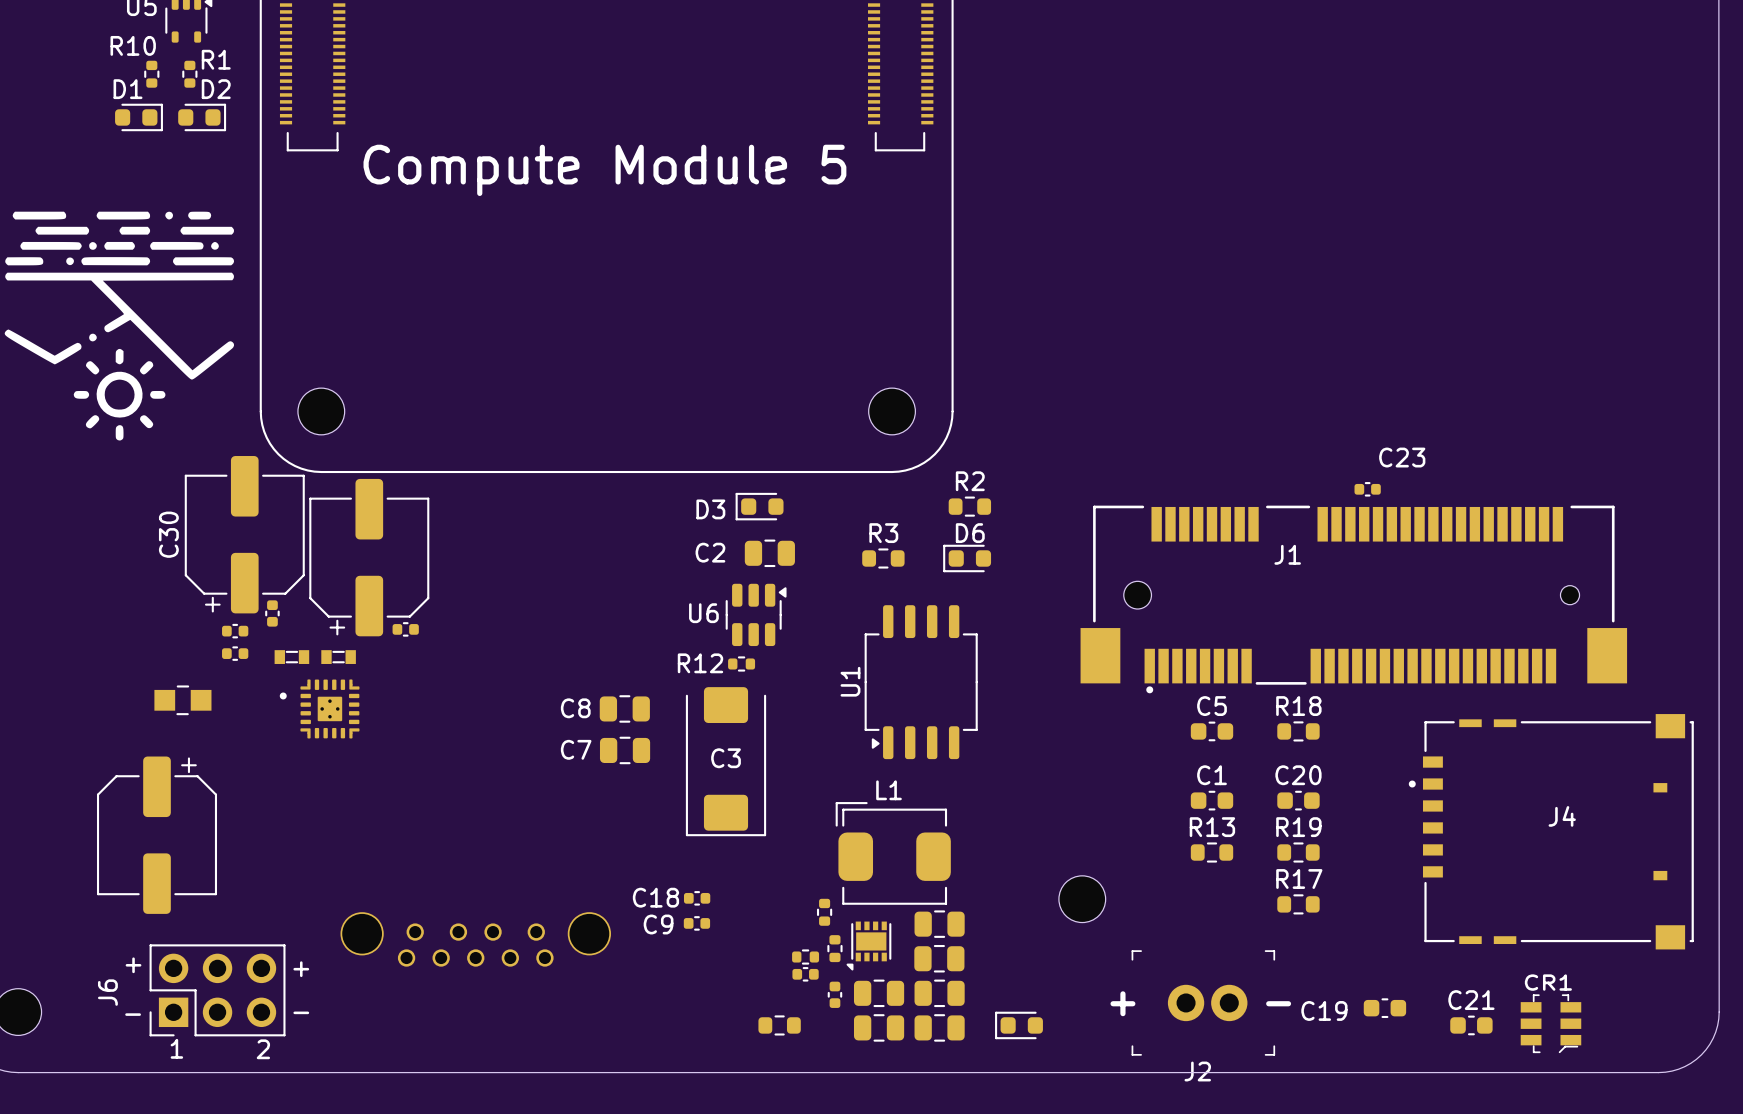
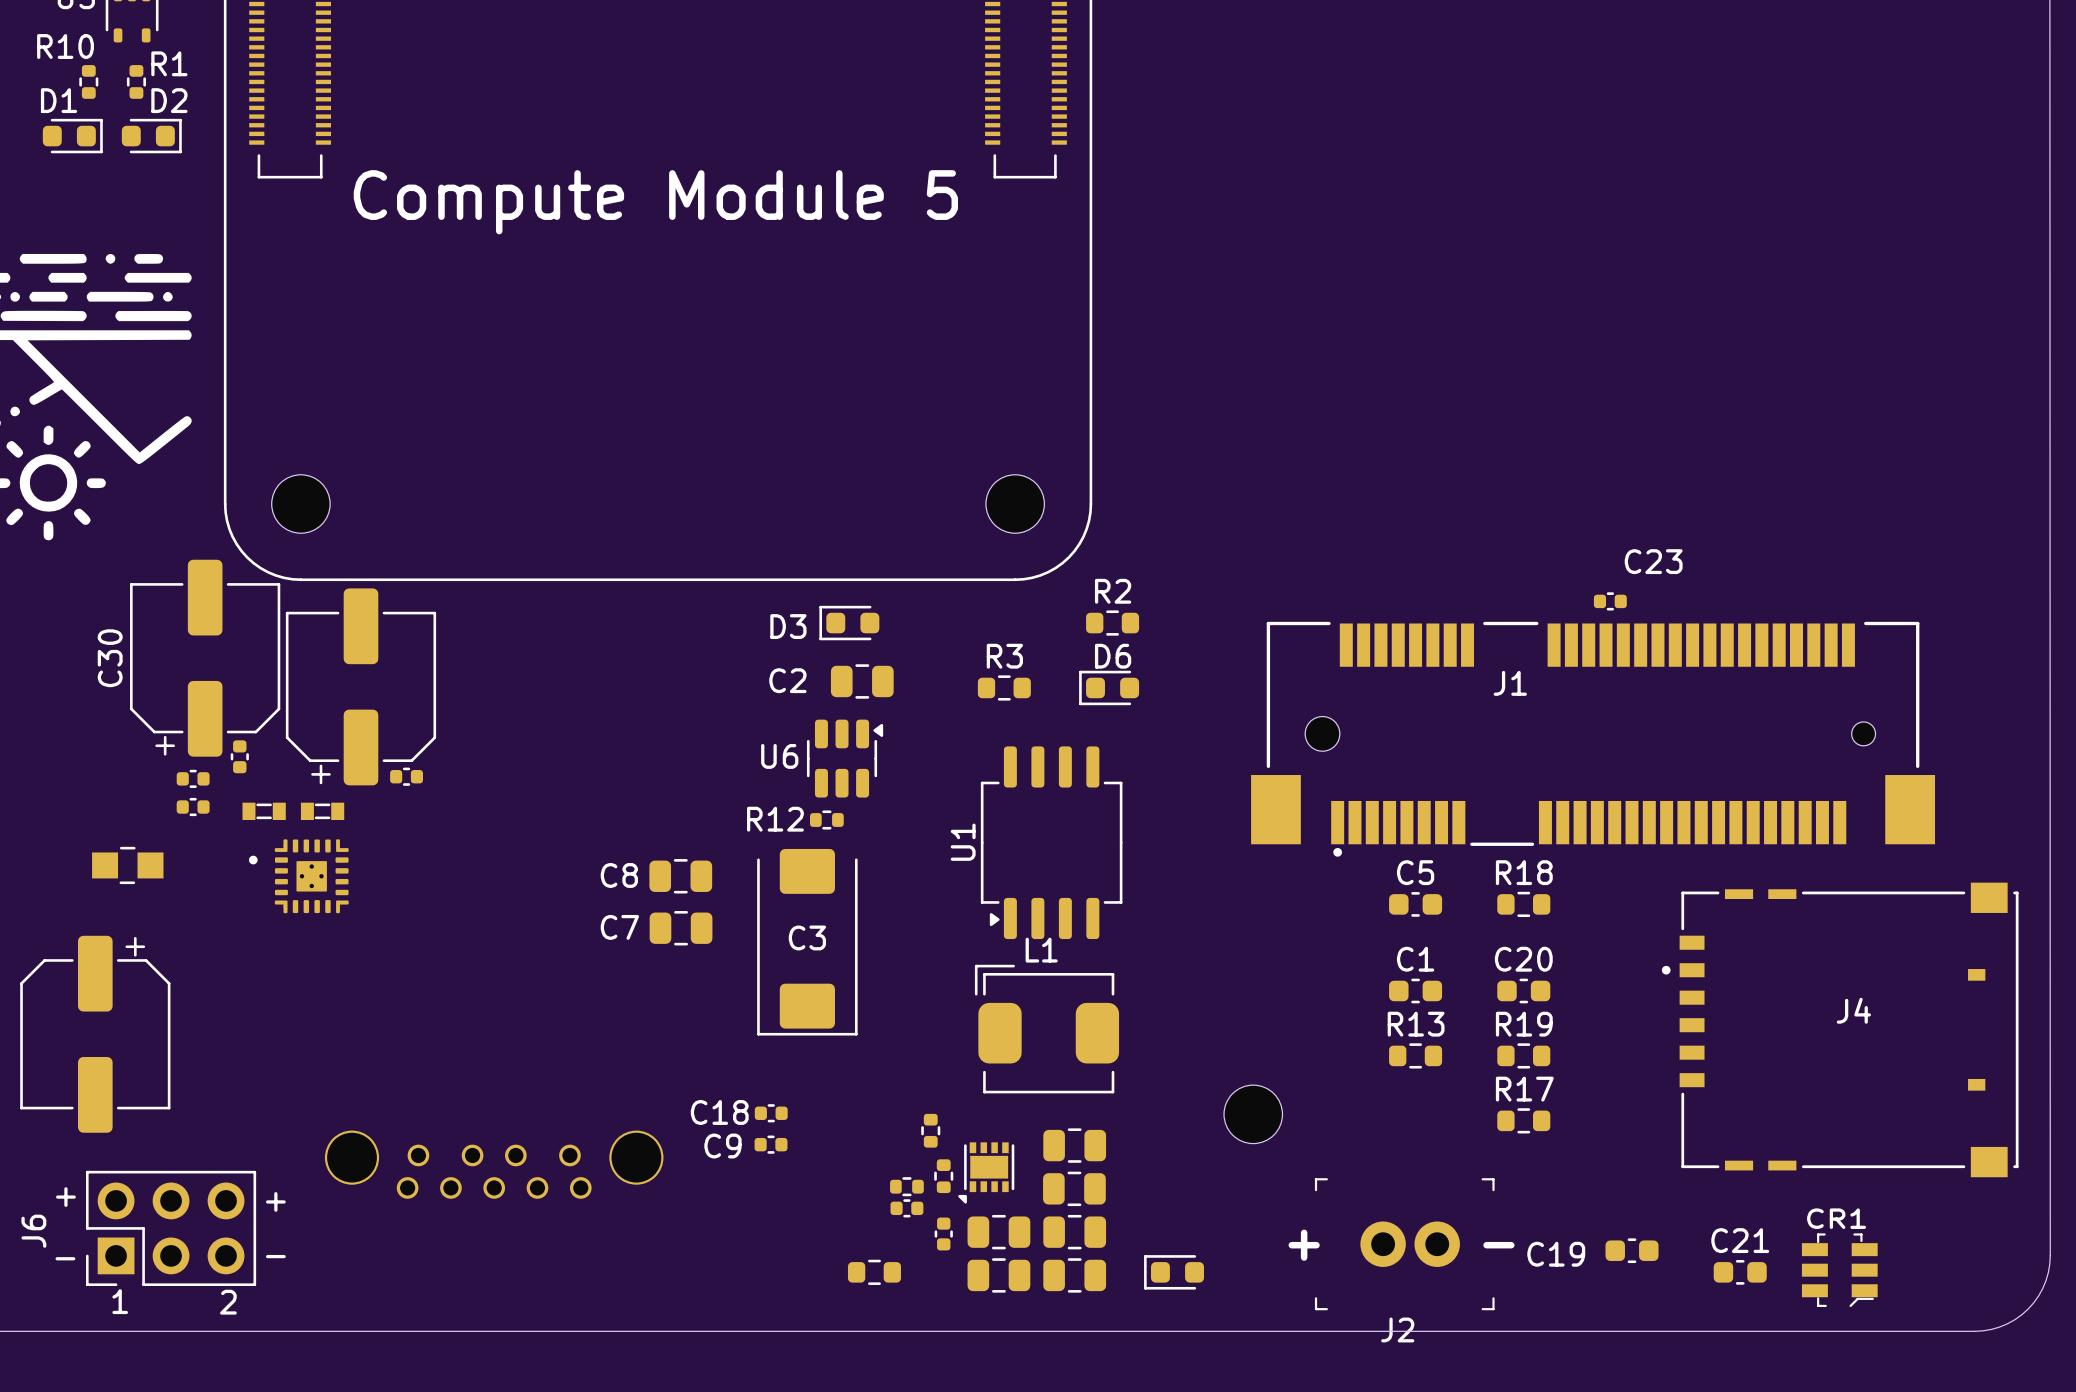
L1 position: (893, 853) -> (1046, 1029)

